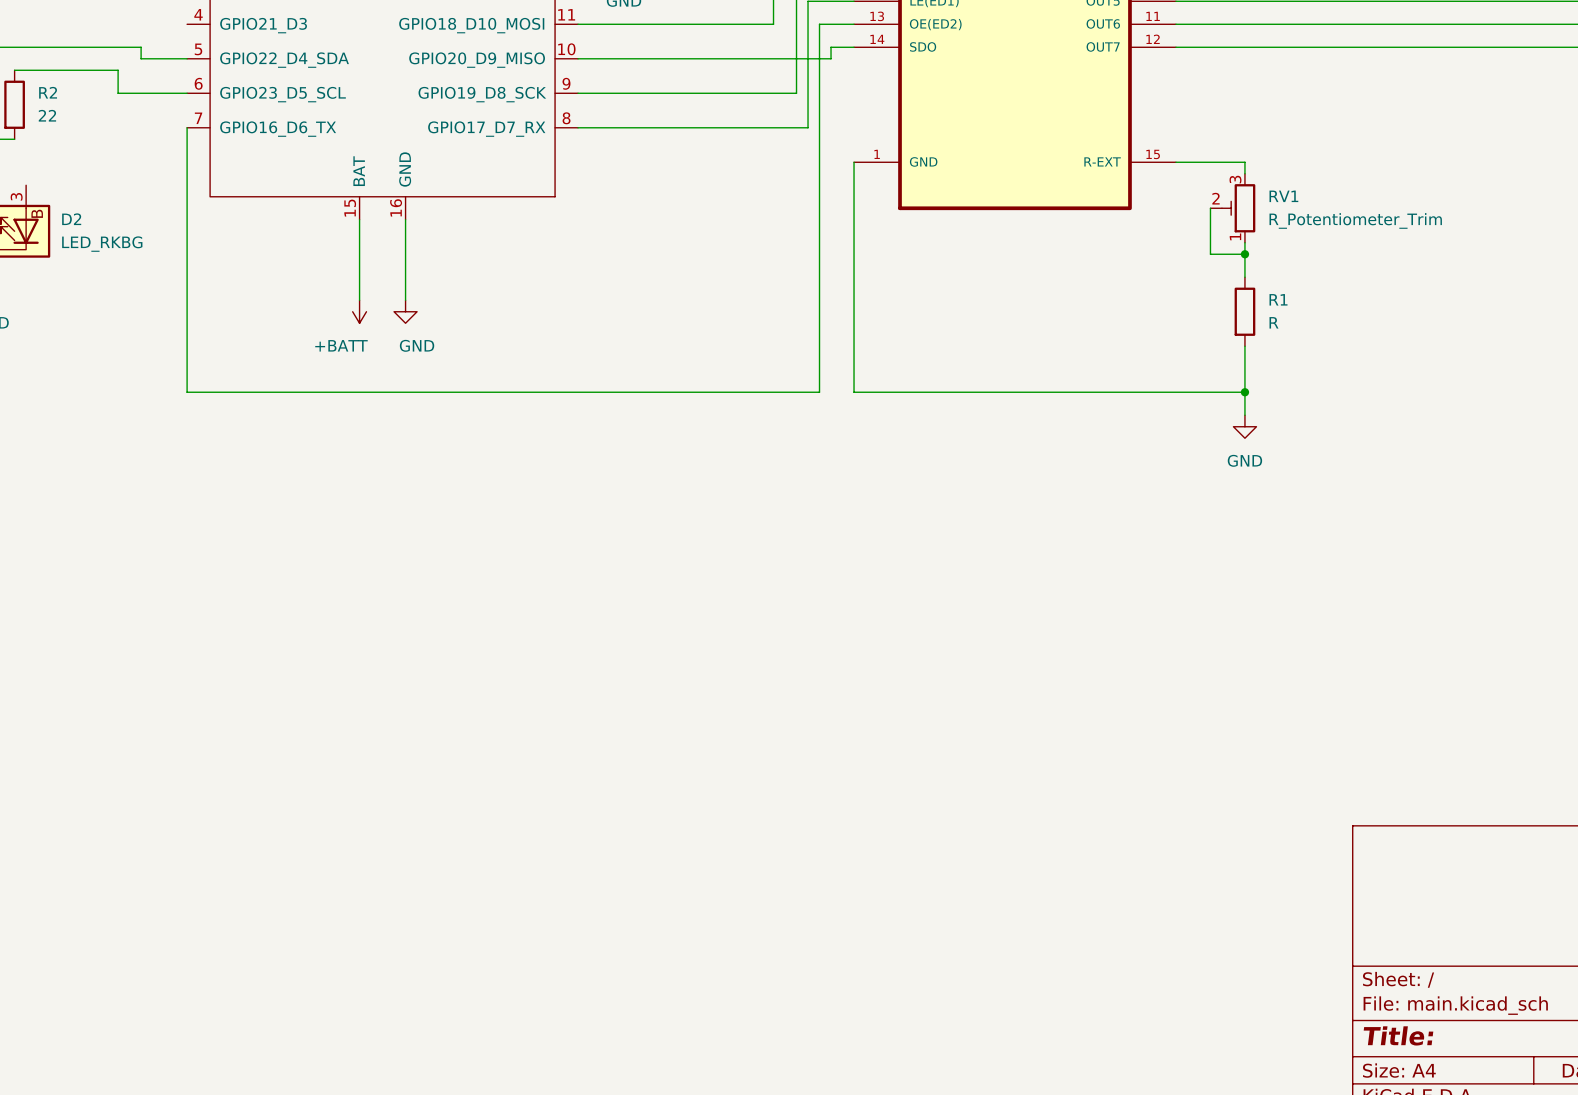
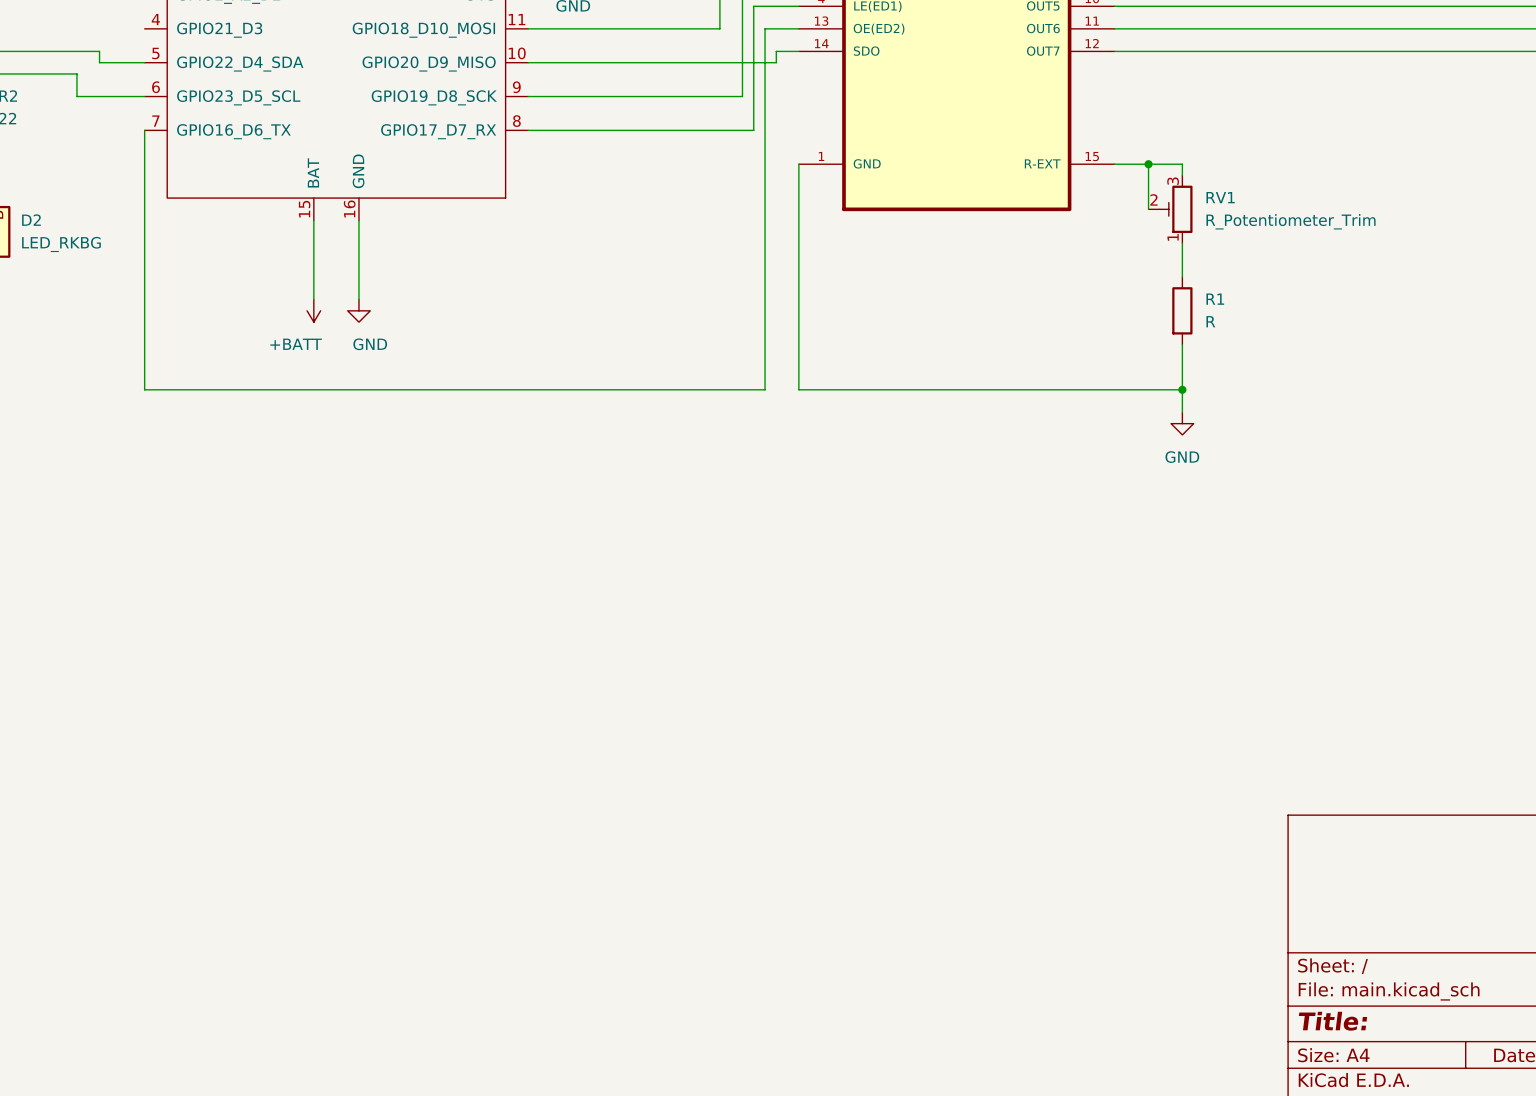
junction: none -> (1148, 164)
wire: (1210, 208) (1210, 254) (1244, 254) -> (1148, 209) (1148, 164)
junction: (1244, 254) -> none

